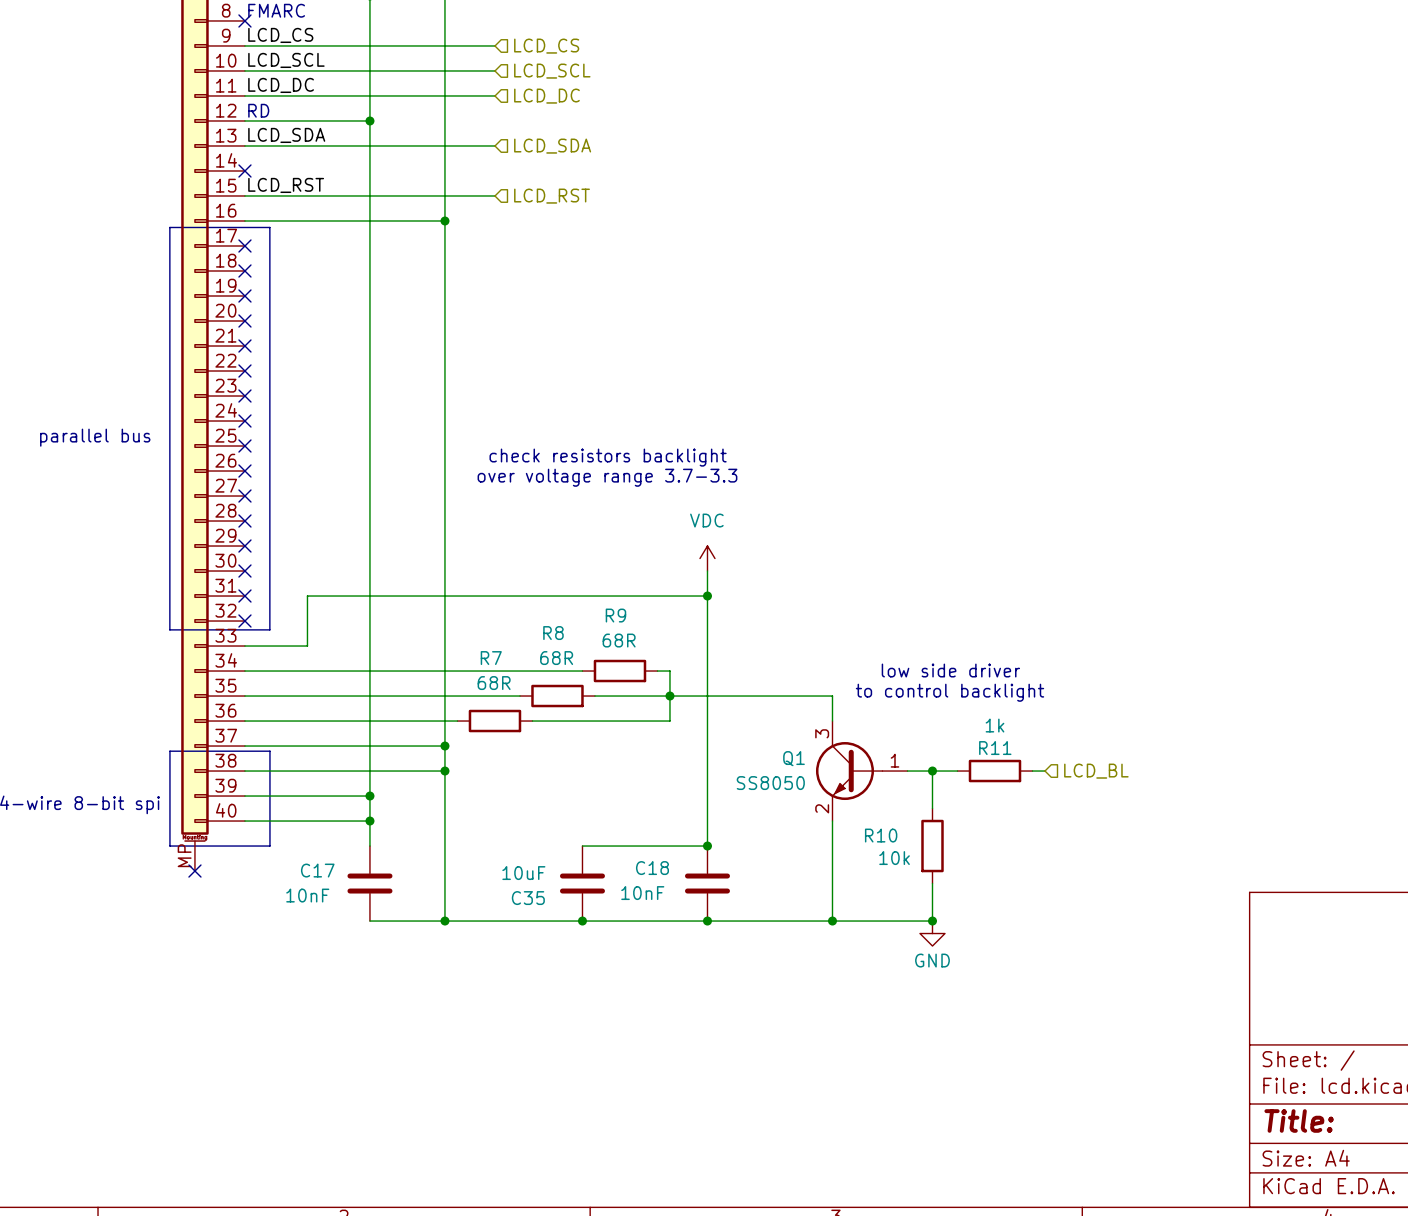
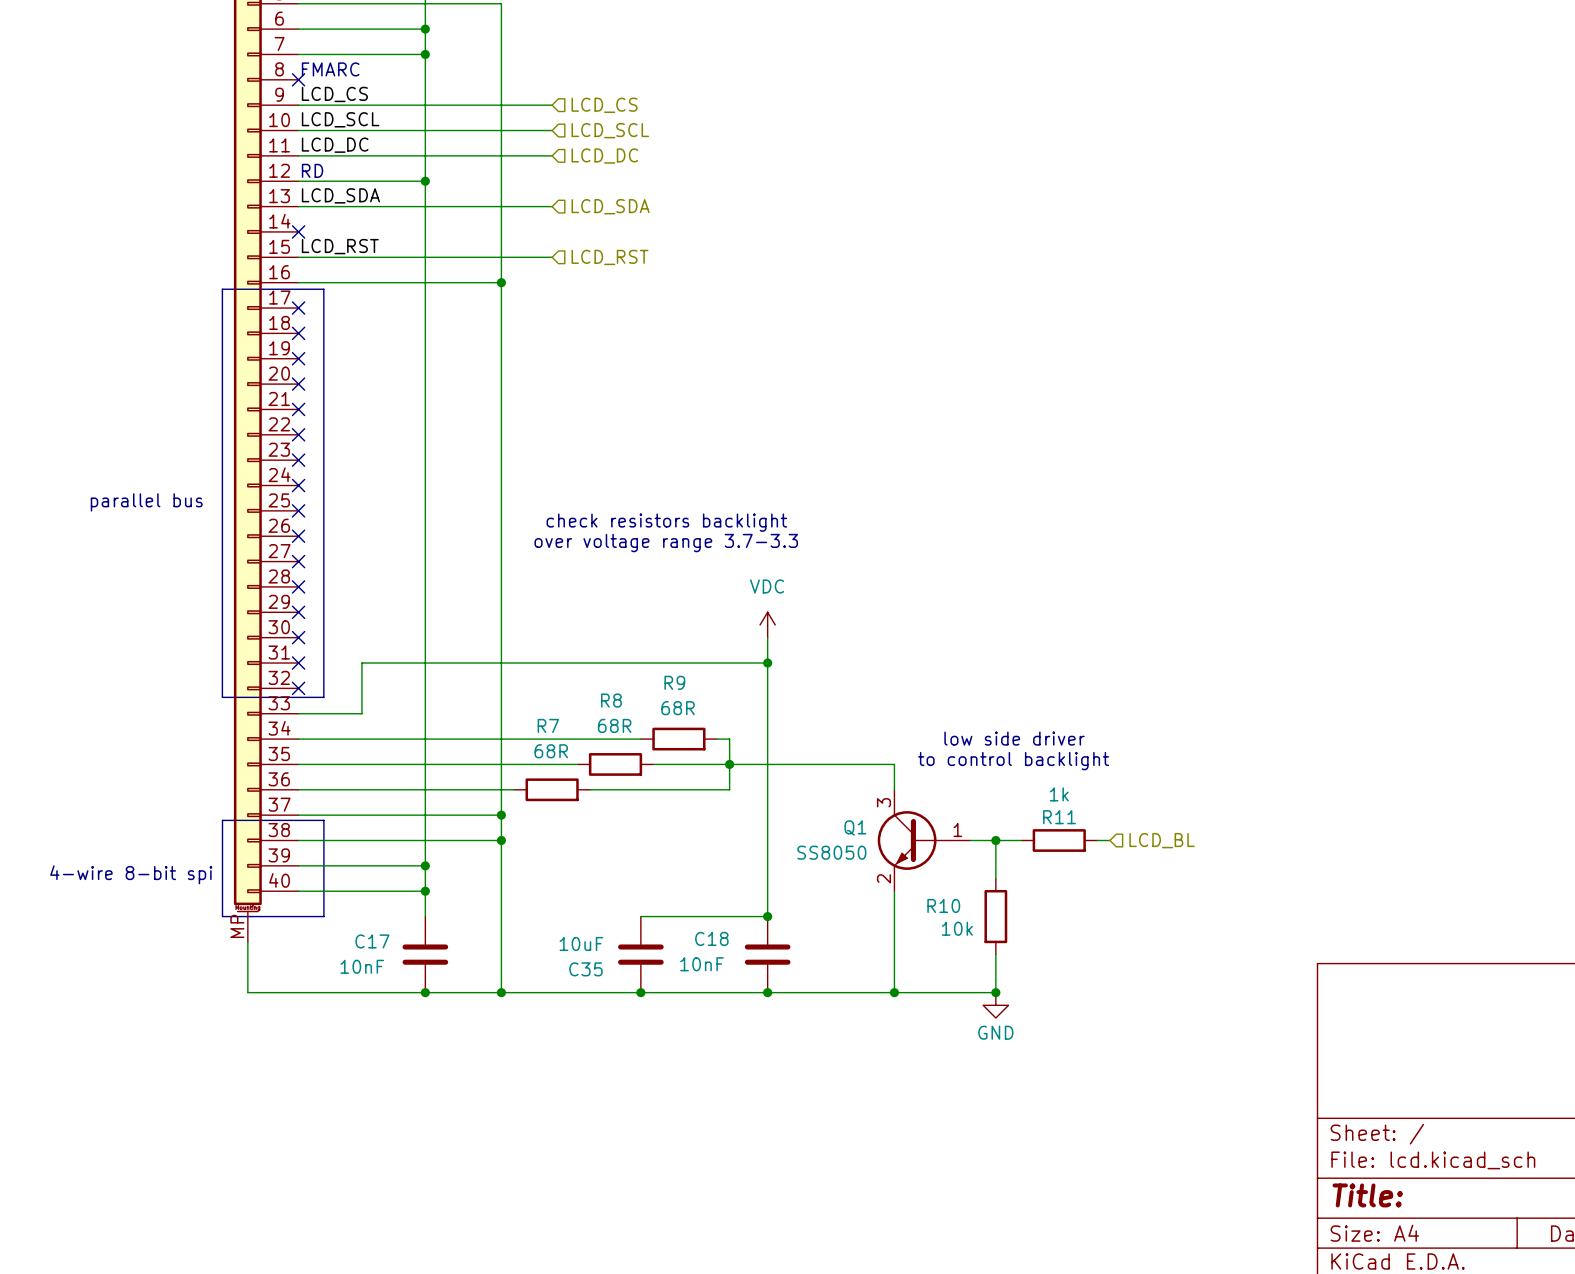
wire: none -> (247, 941) (247, 992) (425, 992)
no-connect mark: (194, 871) -> none
junction: none -> (425, 992)

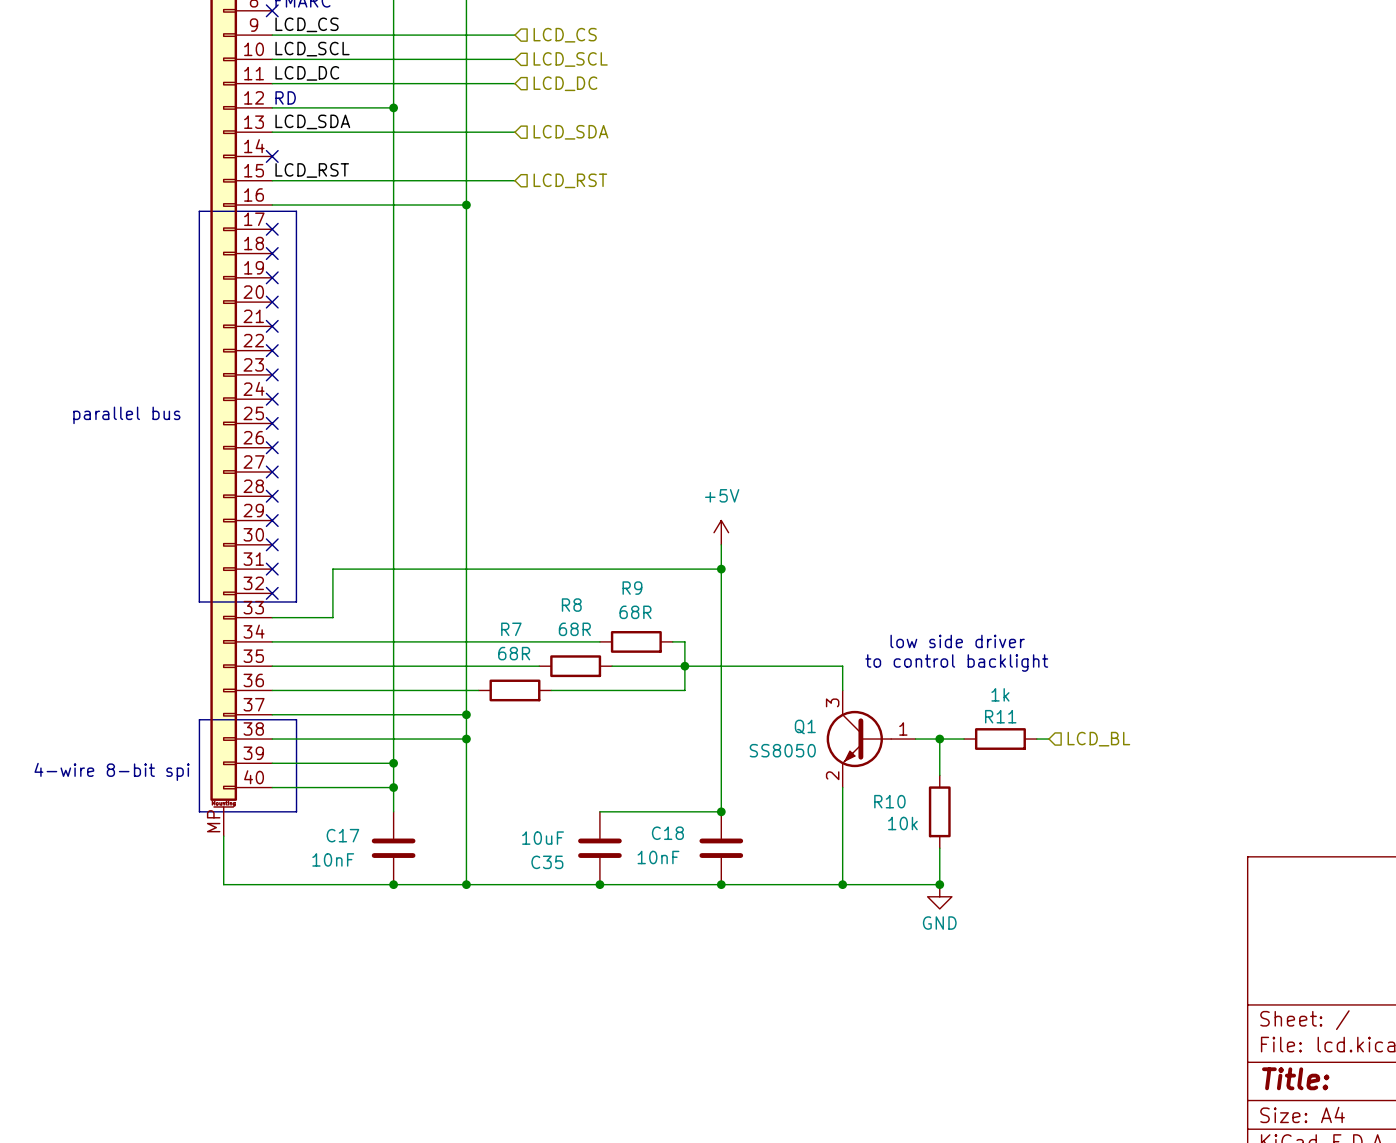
text: check resistors backlight (666, 522) -> none
text: over voltage range 3.7-3.3 (666, 543) -> none
power symbol: VDC (767, 624) -> +5V (721, 532)

